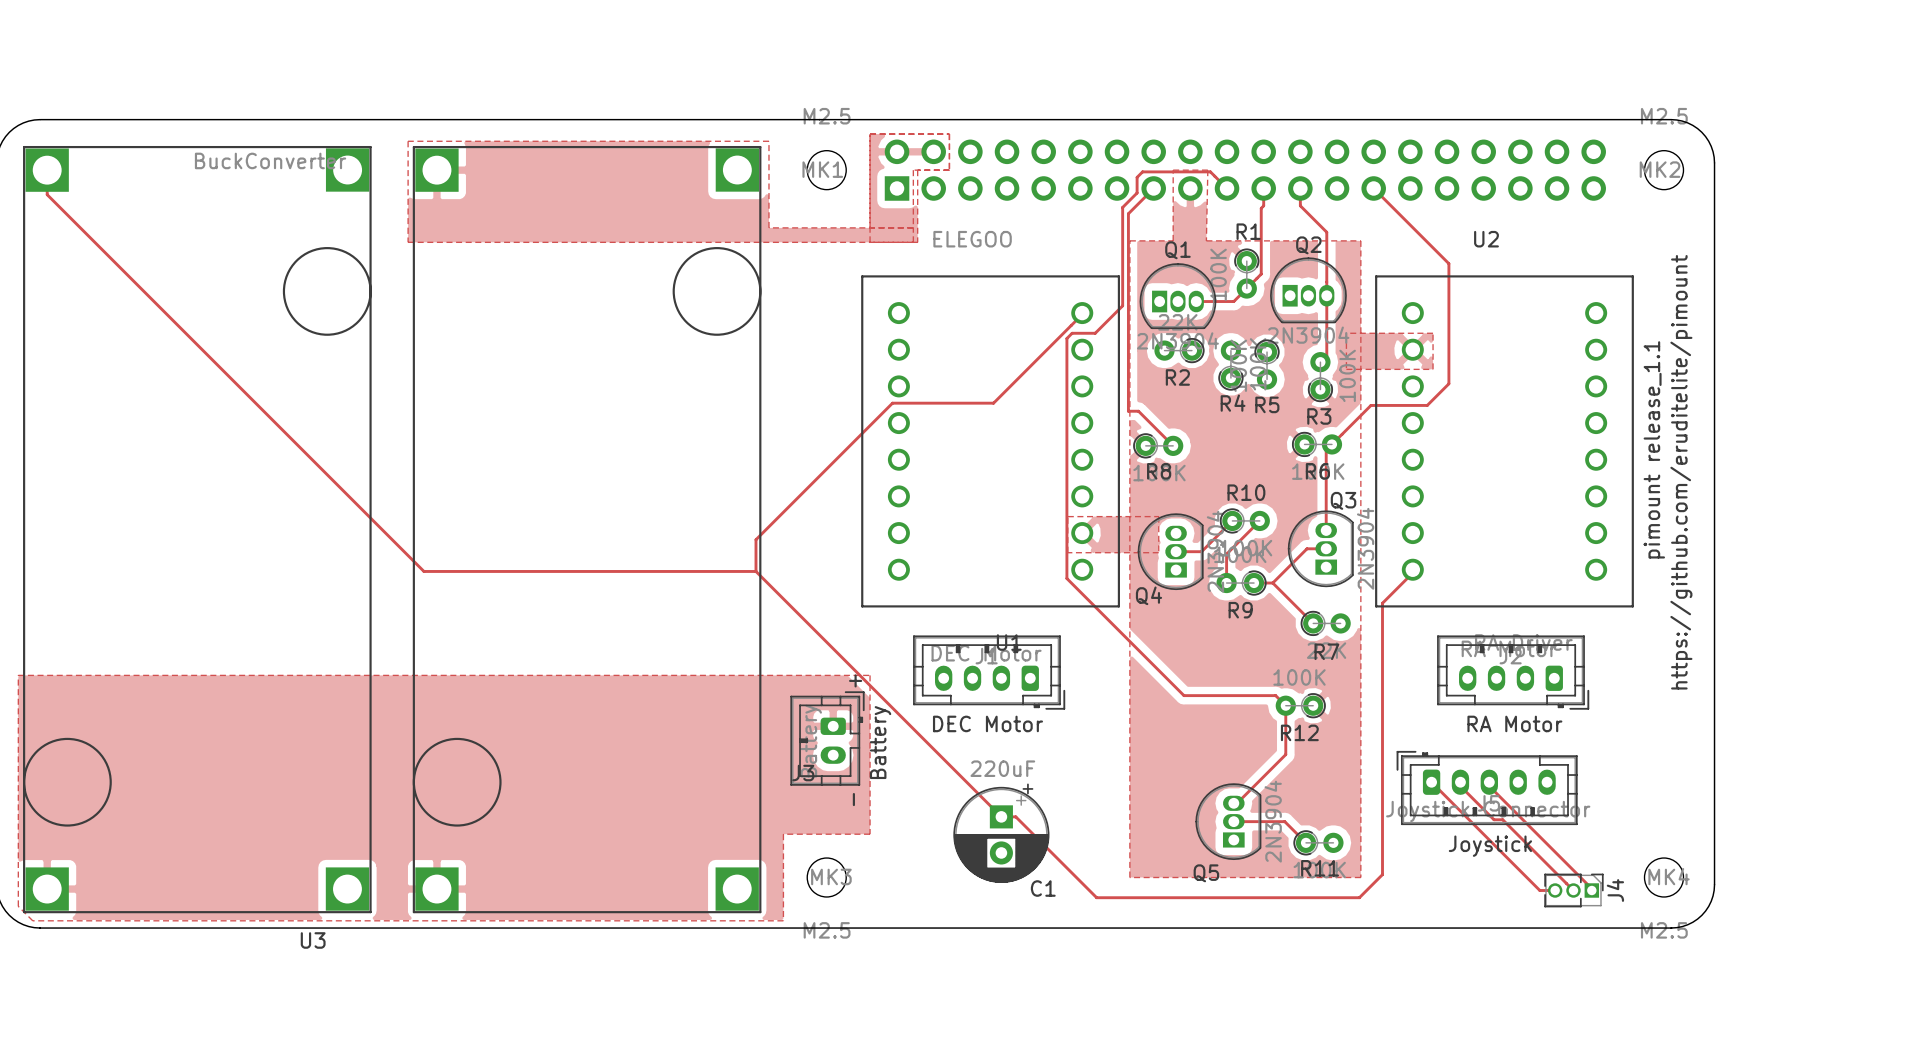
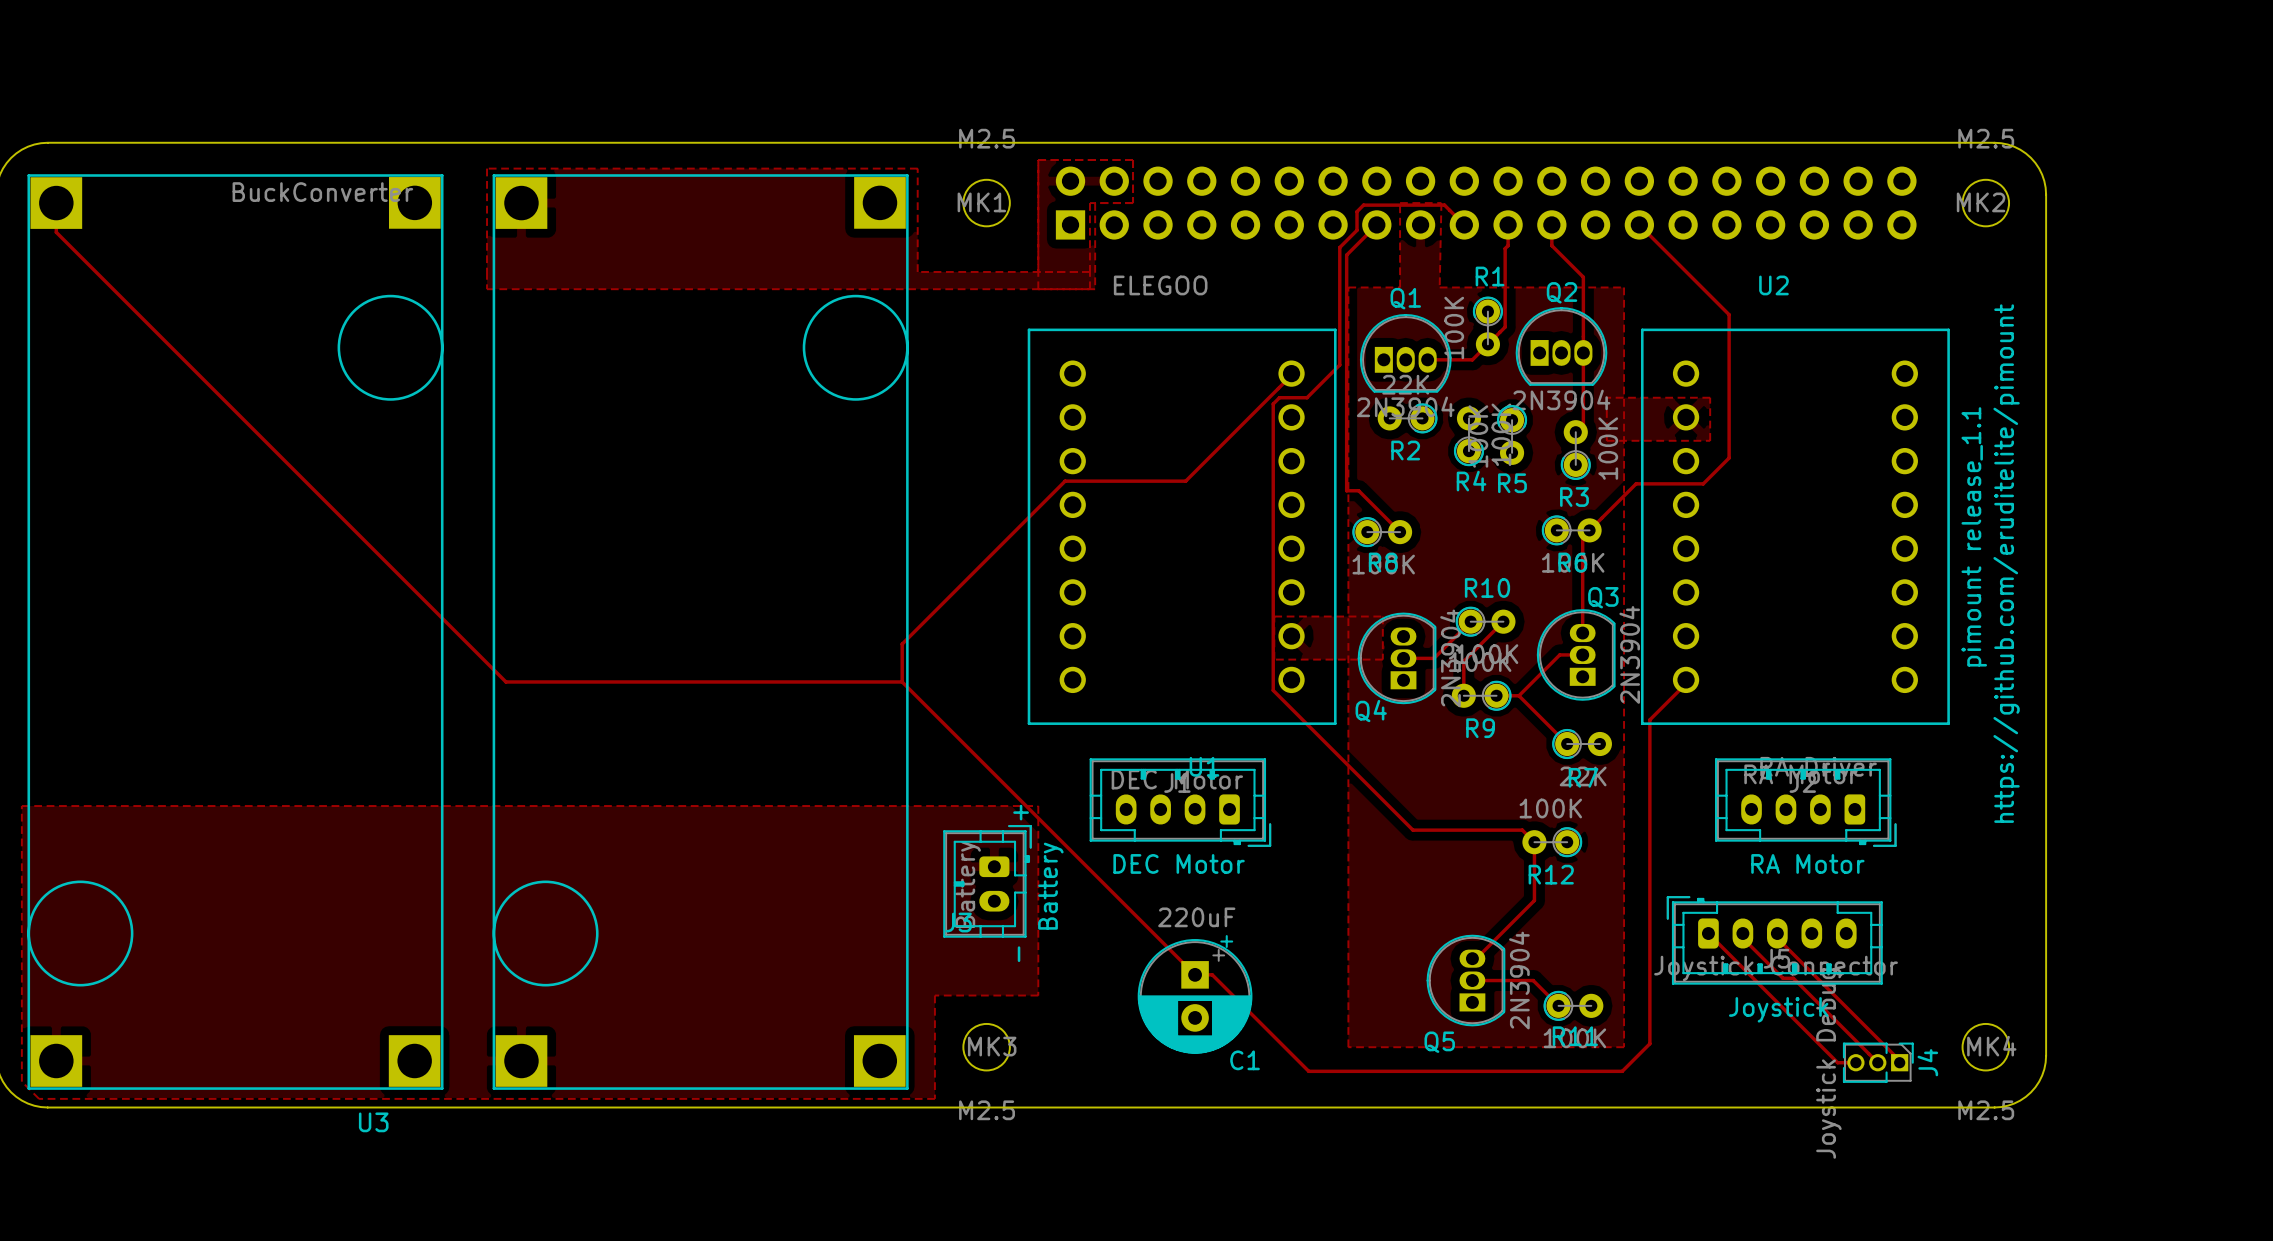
J4 value: none -> Joystick Debug (1828, 1063)

